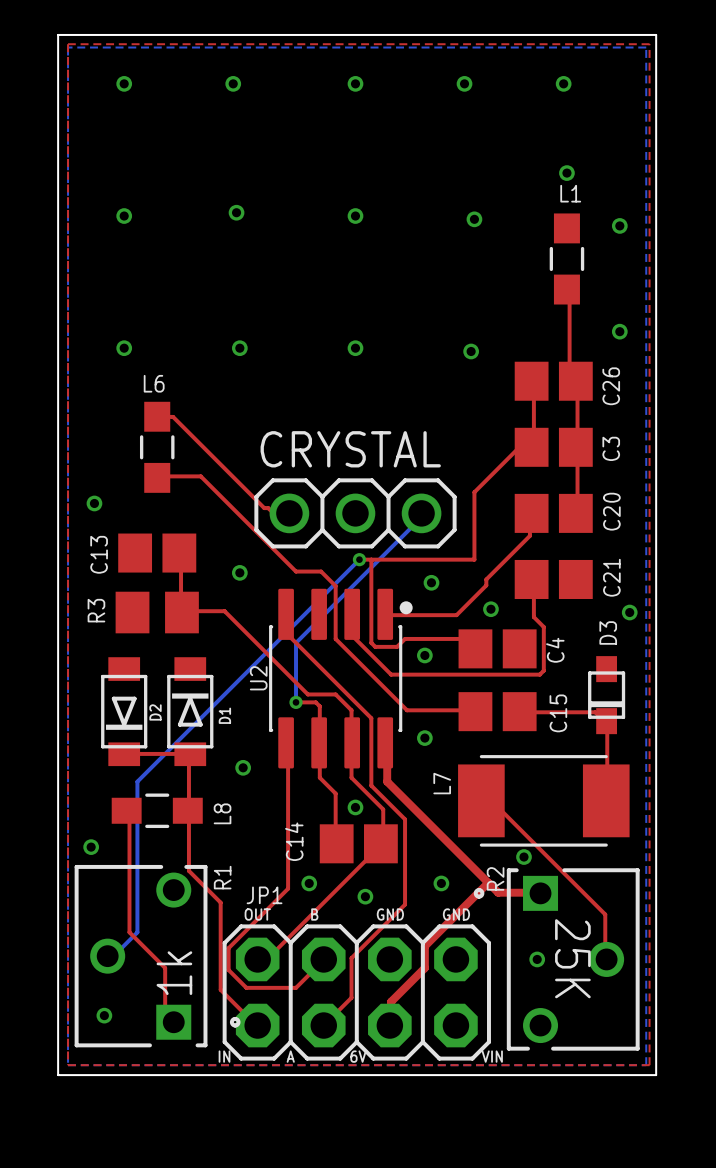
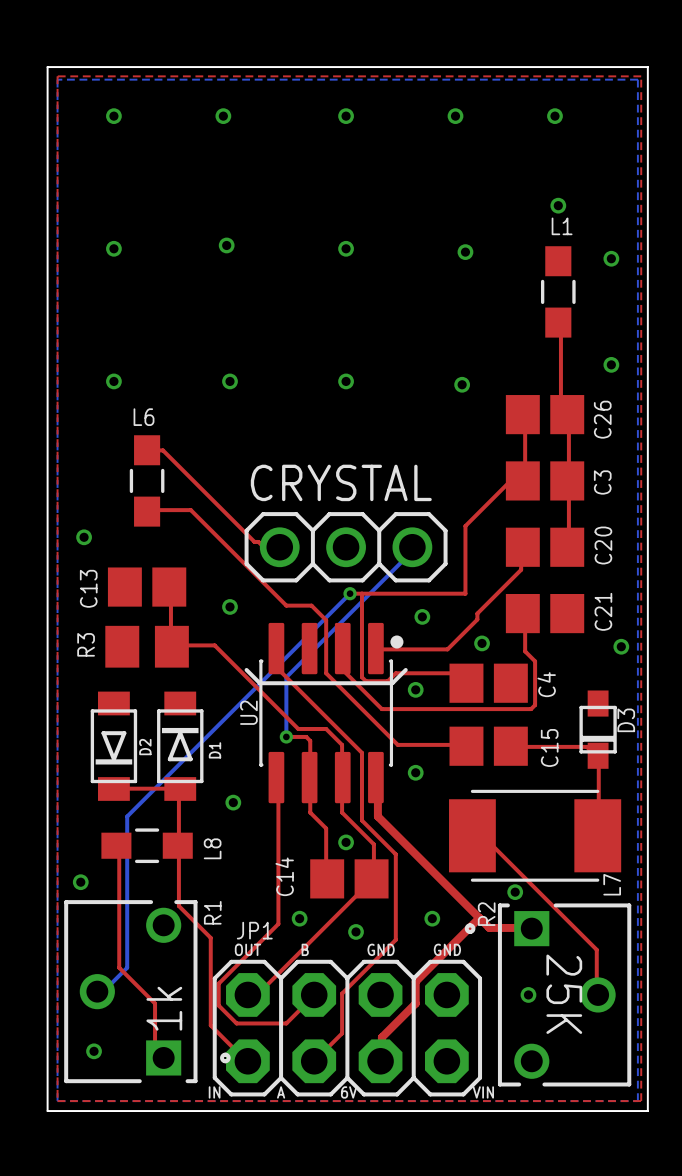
D3 name position: D3 (608, 632) -> D3 (626, 720)
line: none -> (246, 669) (259, 683) (392, 683) (405, 669)
L7 name position: L7 (442, 783) -> L7 (612, 884)

